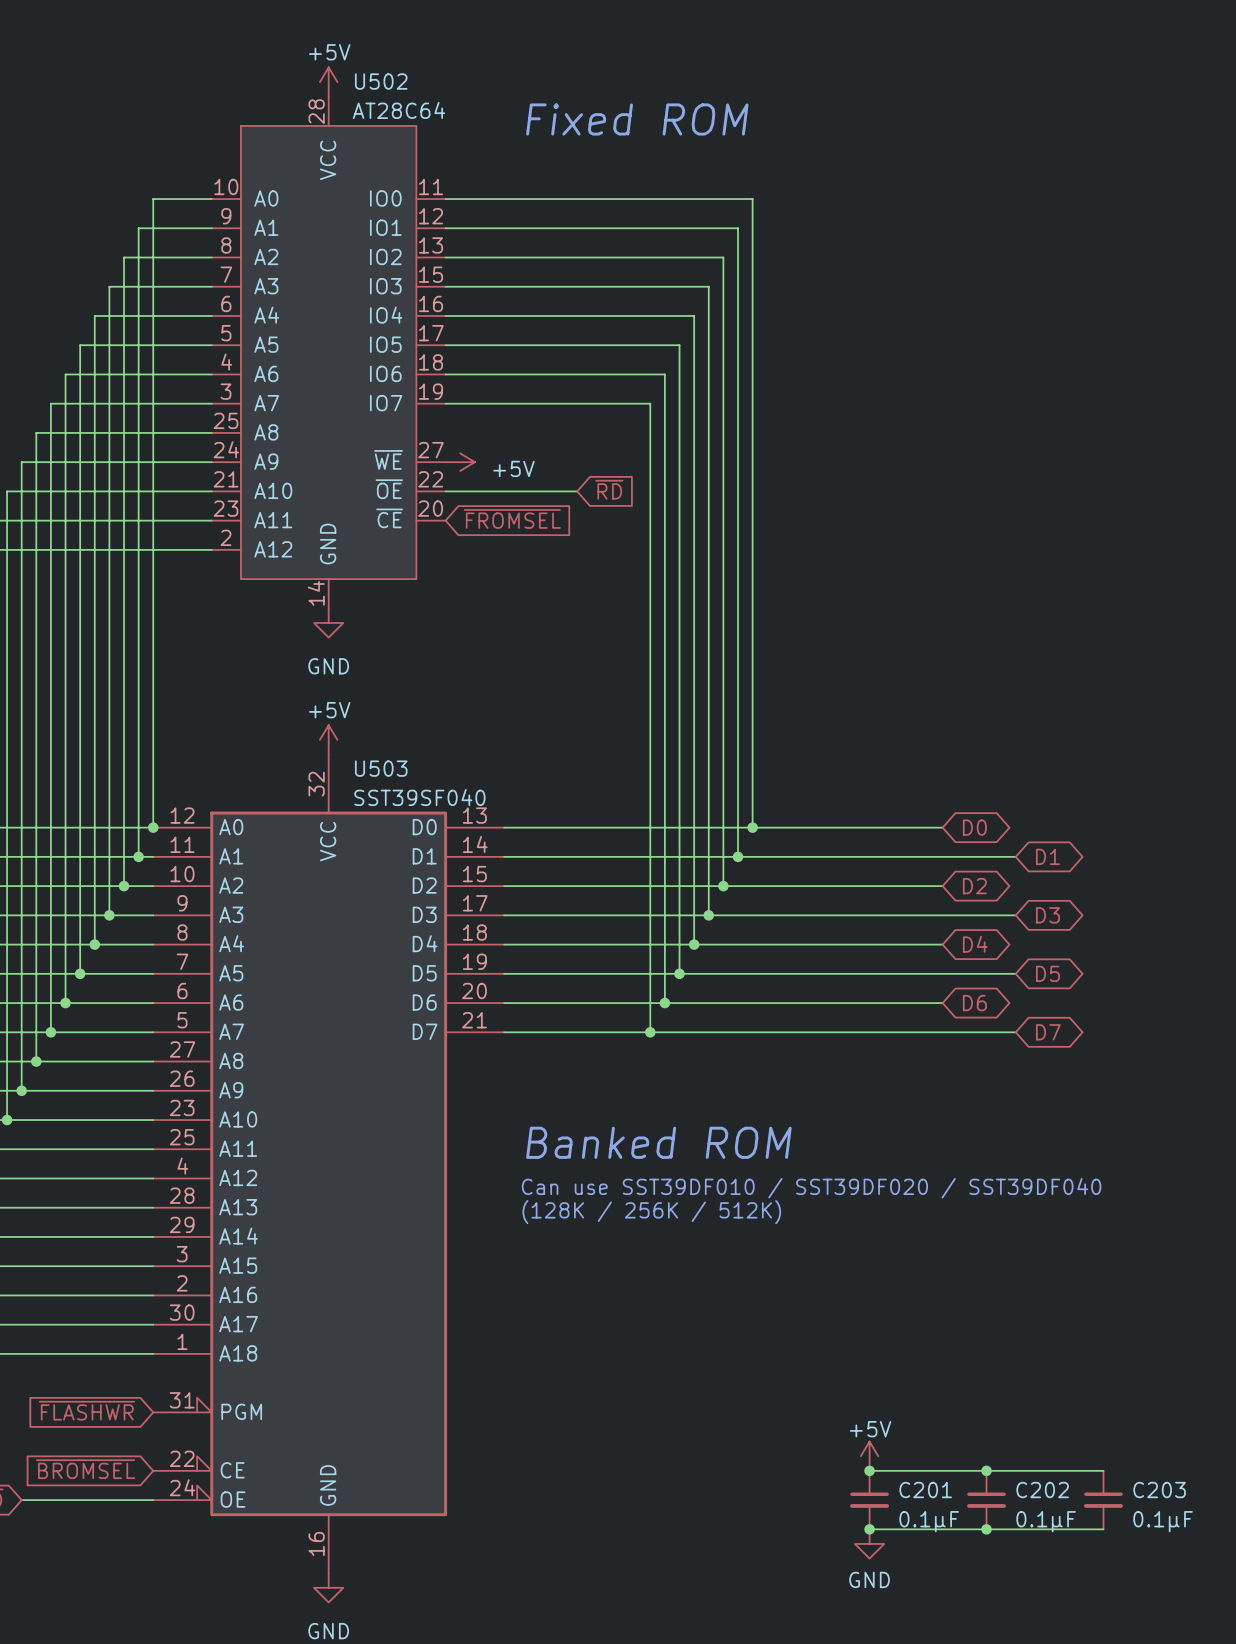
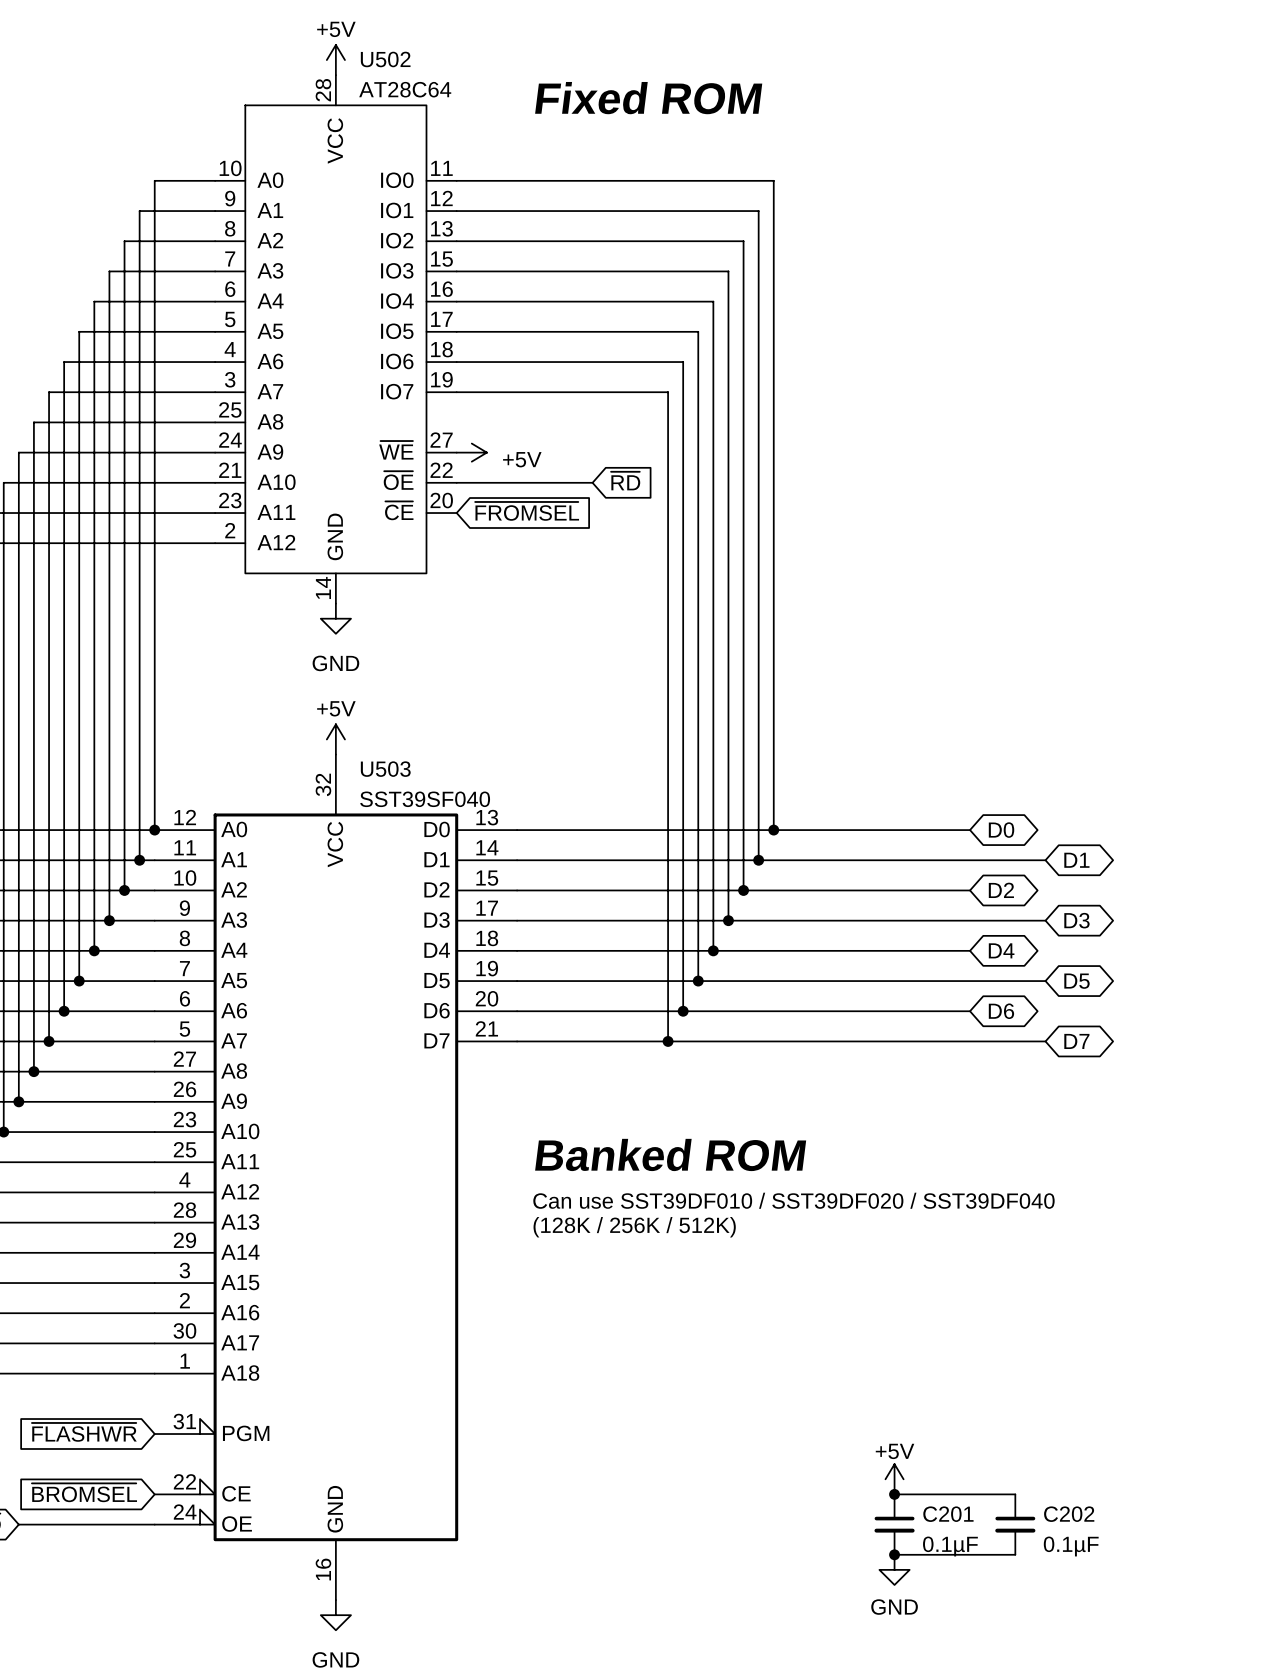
wire: (986, 1470) (1103, 1470) -> none
junction: (986, 1470) -> none
C203: 0.1µF (1103, 1500) -> none
wire: (986, 1529) (1103, 1529) -> none
junction: (986, 1529) -> none

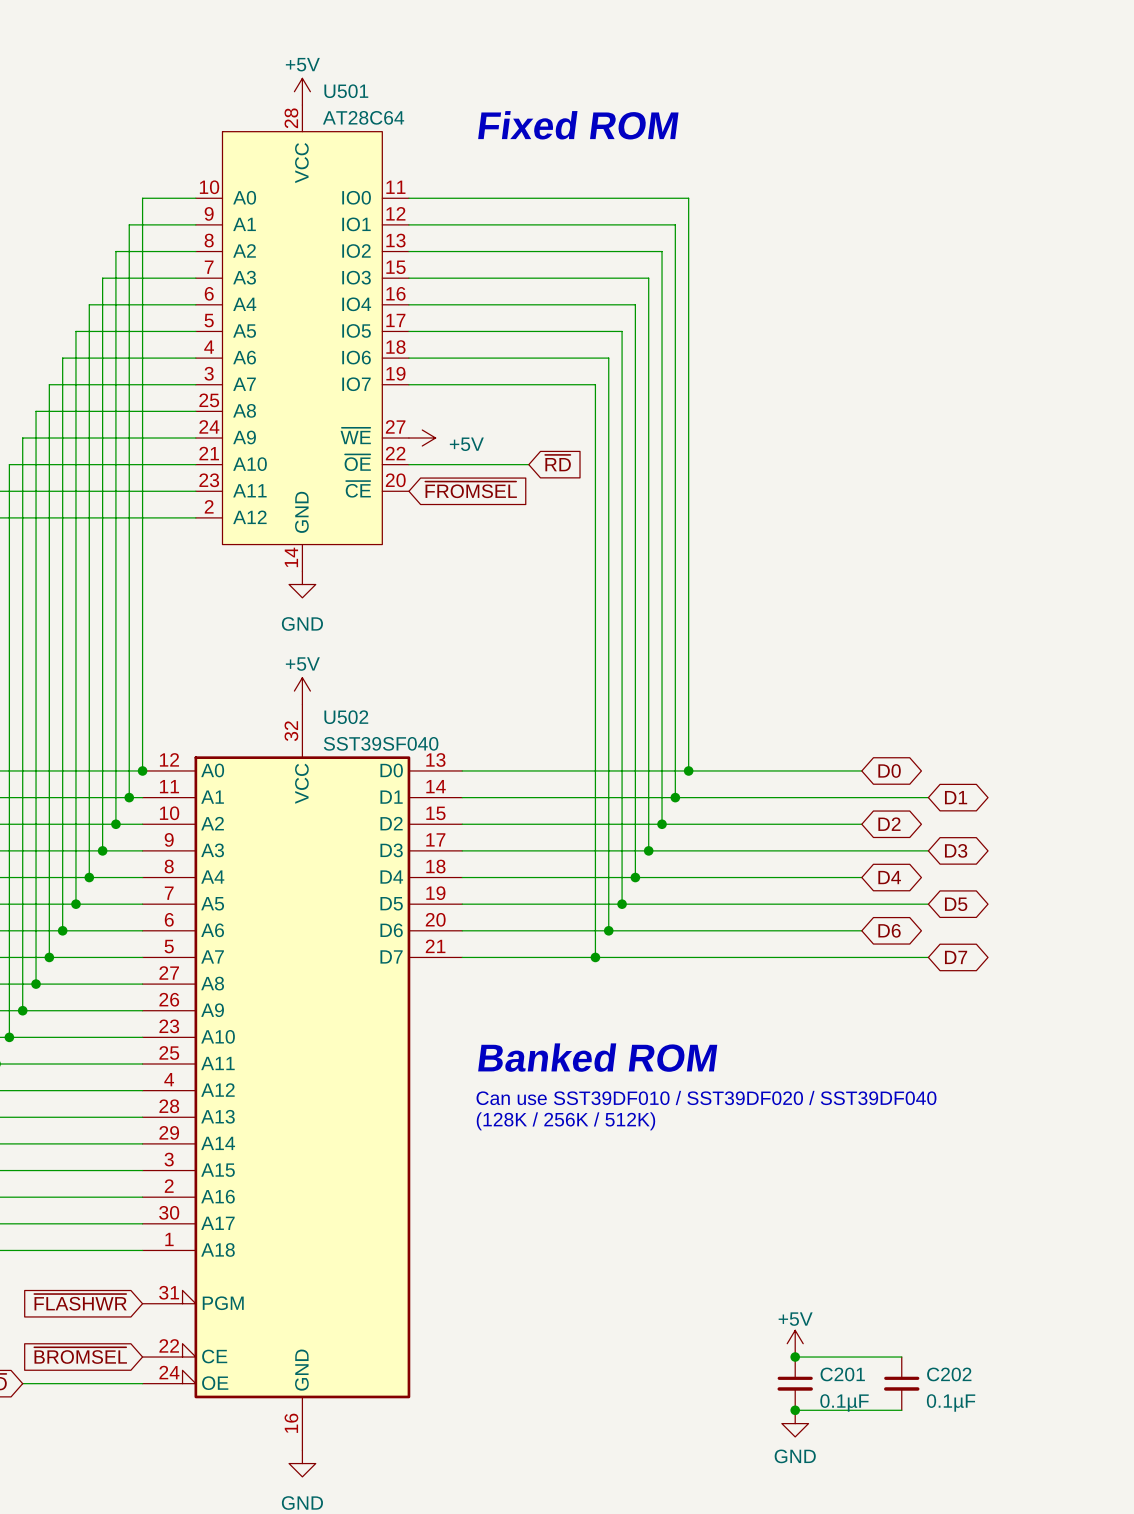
U502 name: U502 (385, 59) -> U501 (346, 91)
U503 name: U503 (385, 769) -> U502 (346, 717)

